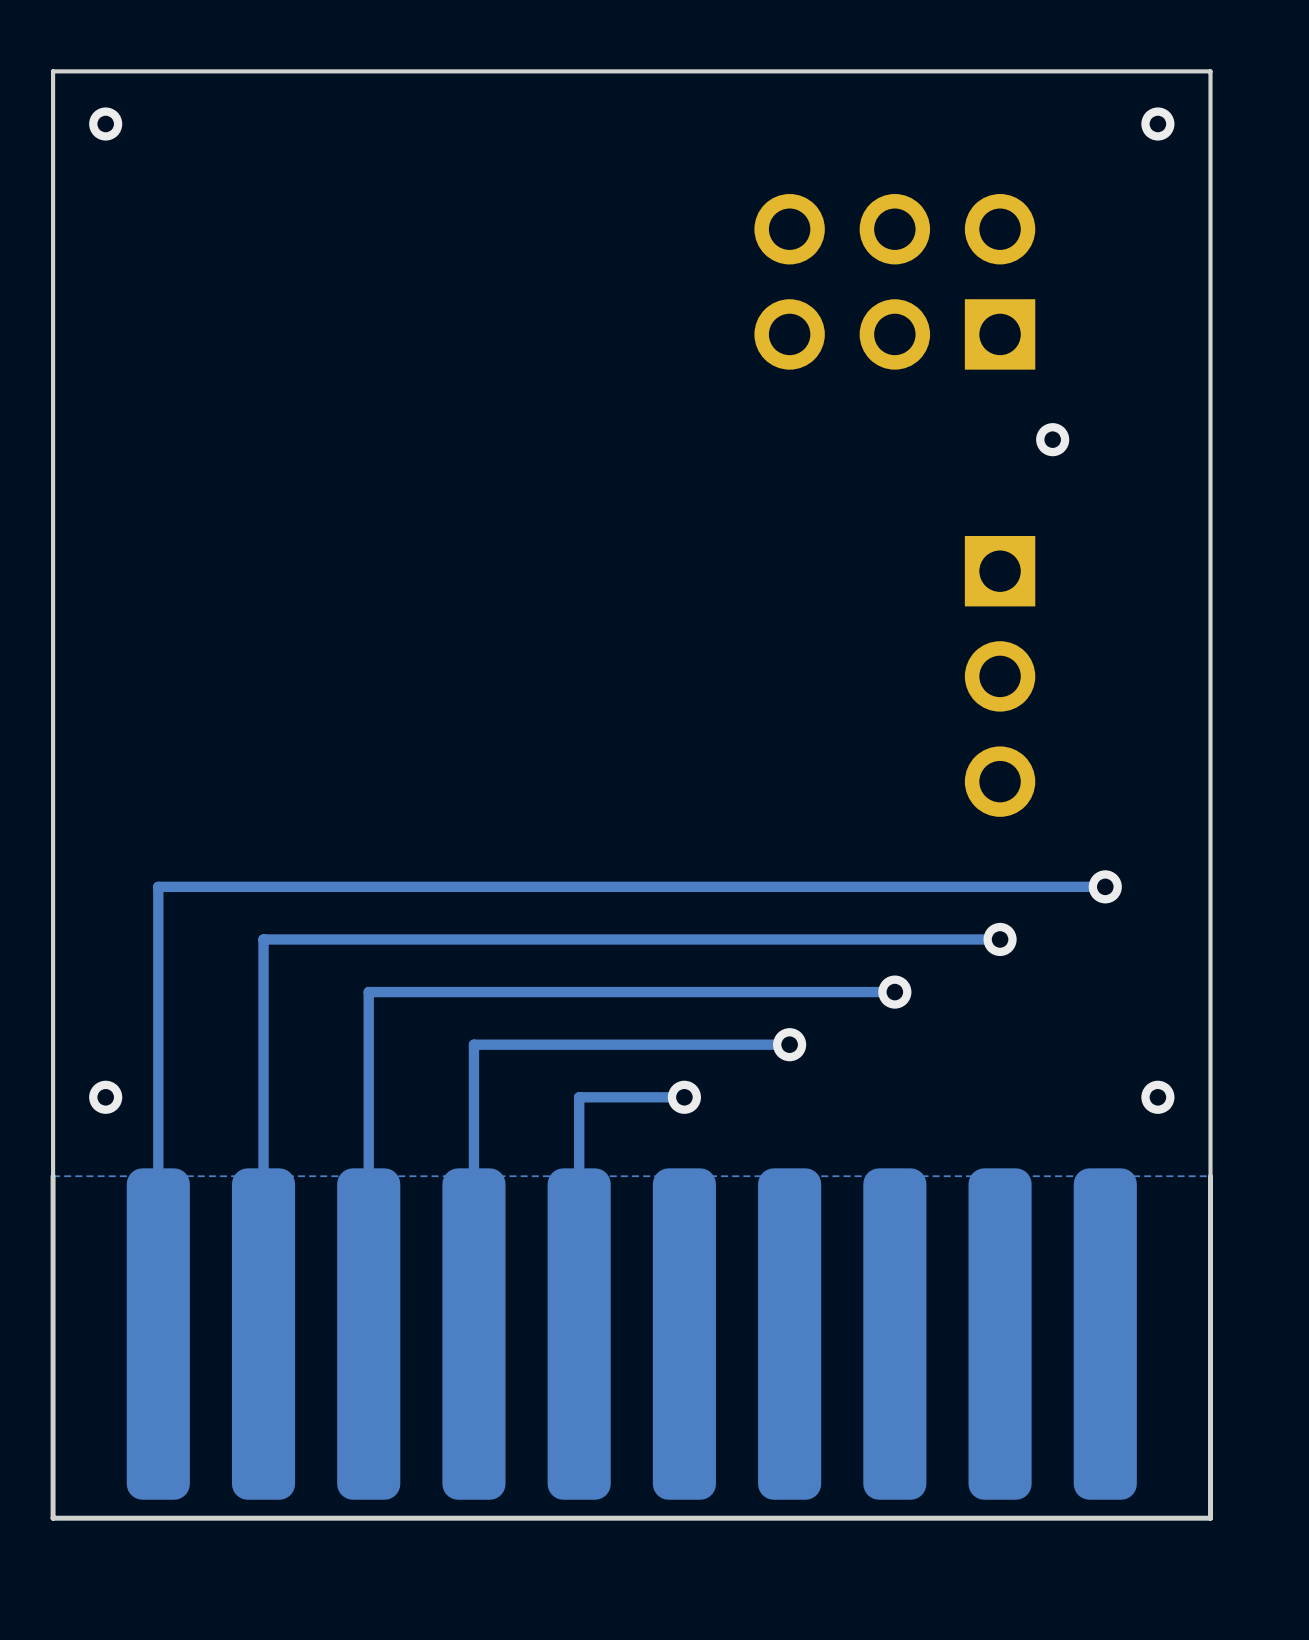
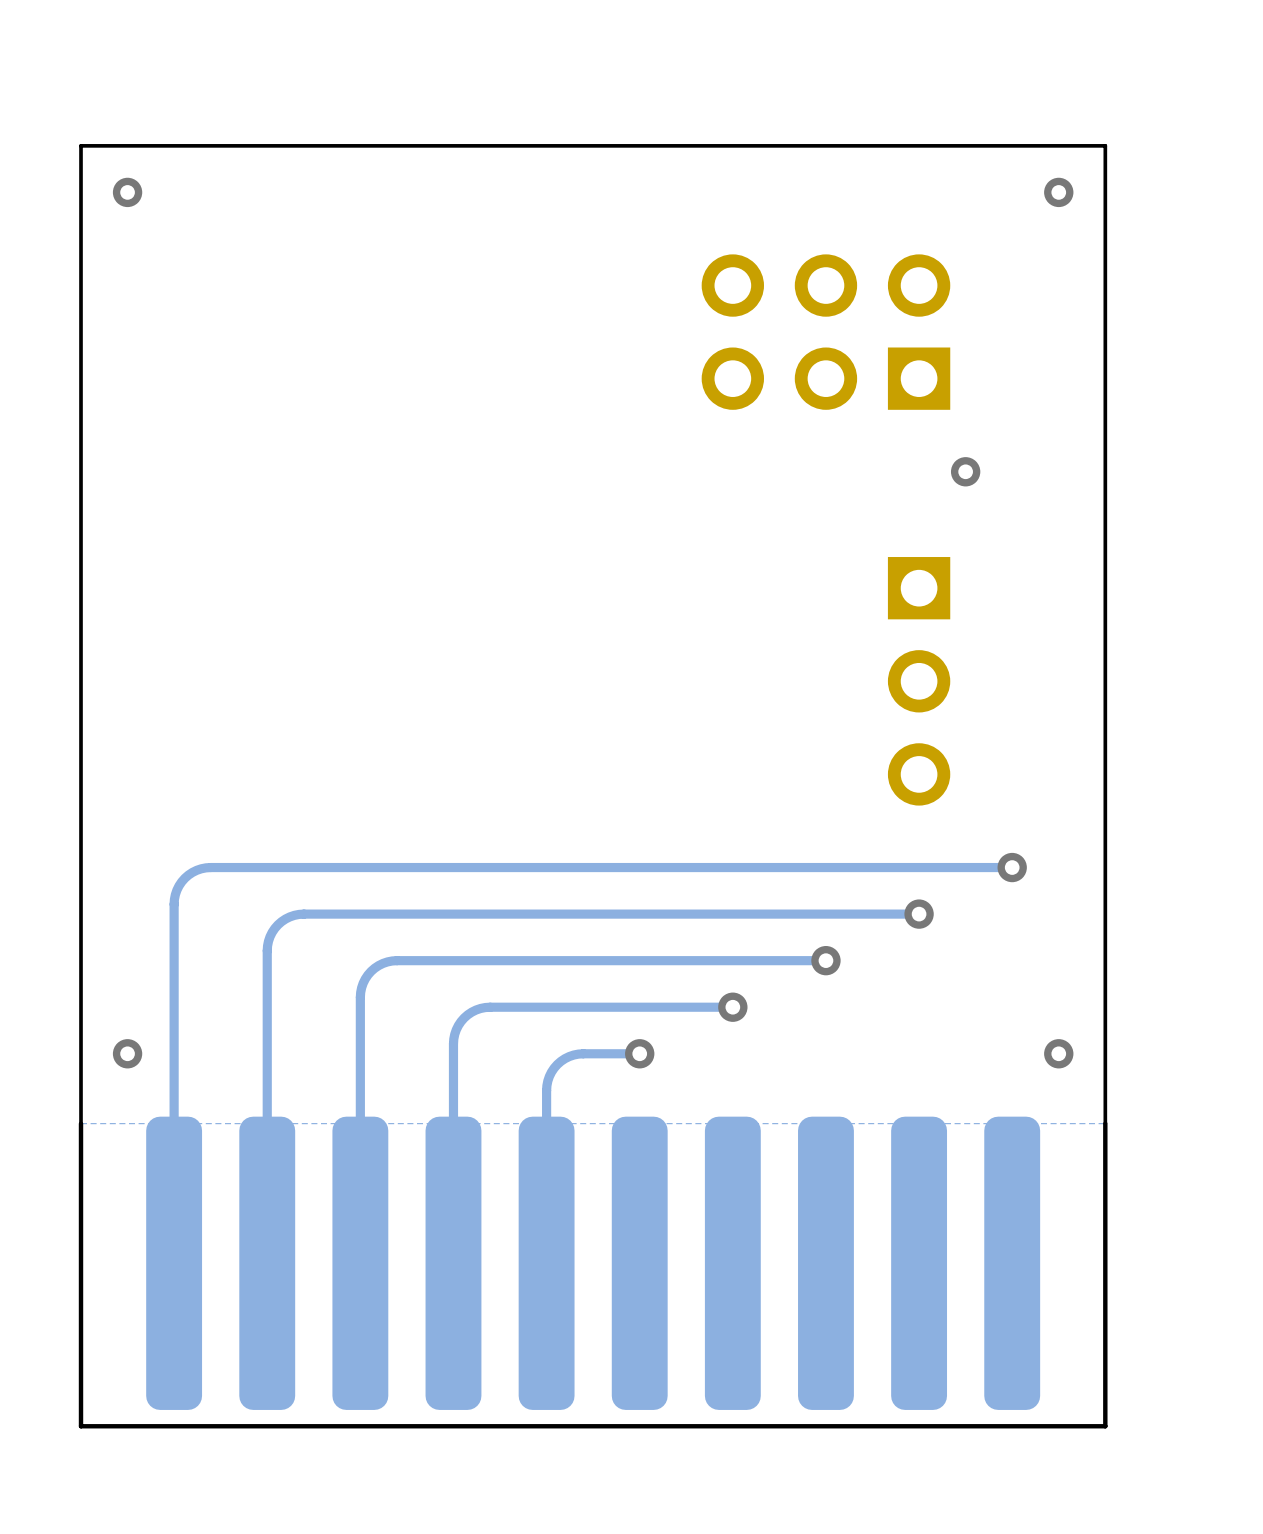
track: (199, 886) (158, 886) (158, 928) -> (210, 867) (196, 870) (184, 878) (176, 890) (174, 904)
track: (304, 939) (263, 939) (263, 980) -> (303, 914) (289, 916) (277, 924) (270, 936) (267, 950)
track: (410, 992) (368, 992) (368, 1033) -> (397, 960) (382, 963) (371, 971) (363, 983) (360, 997)
track: (515, 1044) (473, 1044) (473, 1086) -> (490, 1007) (476, 1010) (464, 1017) (456, 1029) (453, 1043)
track: (620, 1097) (579, 1097) (579, 1138) -> (583, 1053) (569, 1056) (557, 1064) (549, 1076) (546, 1090)

